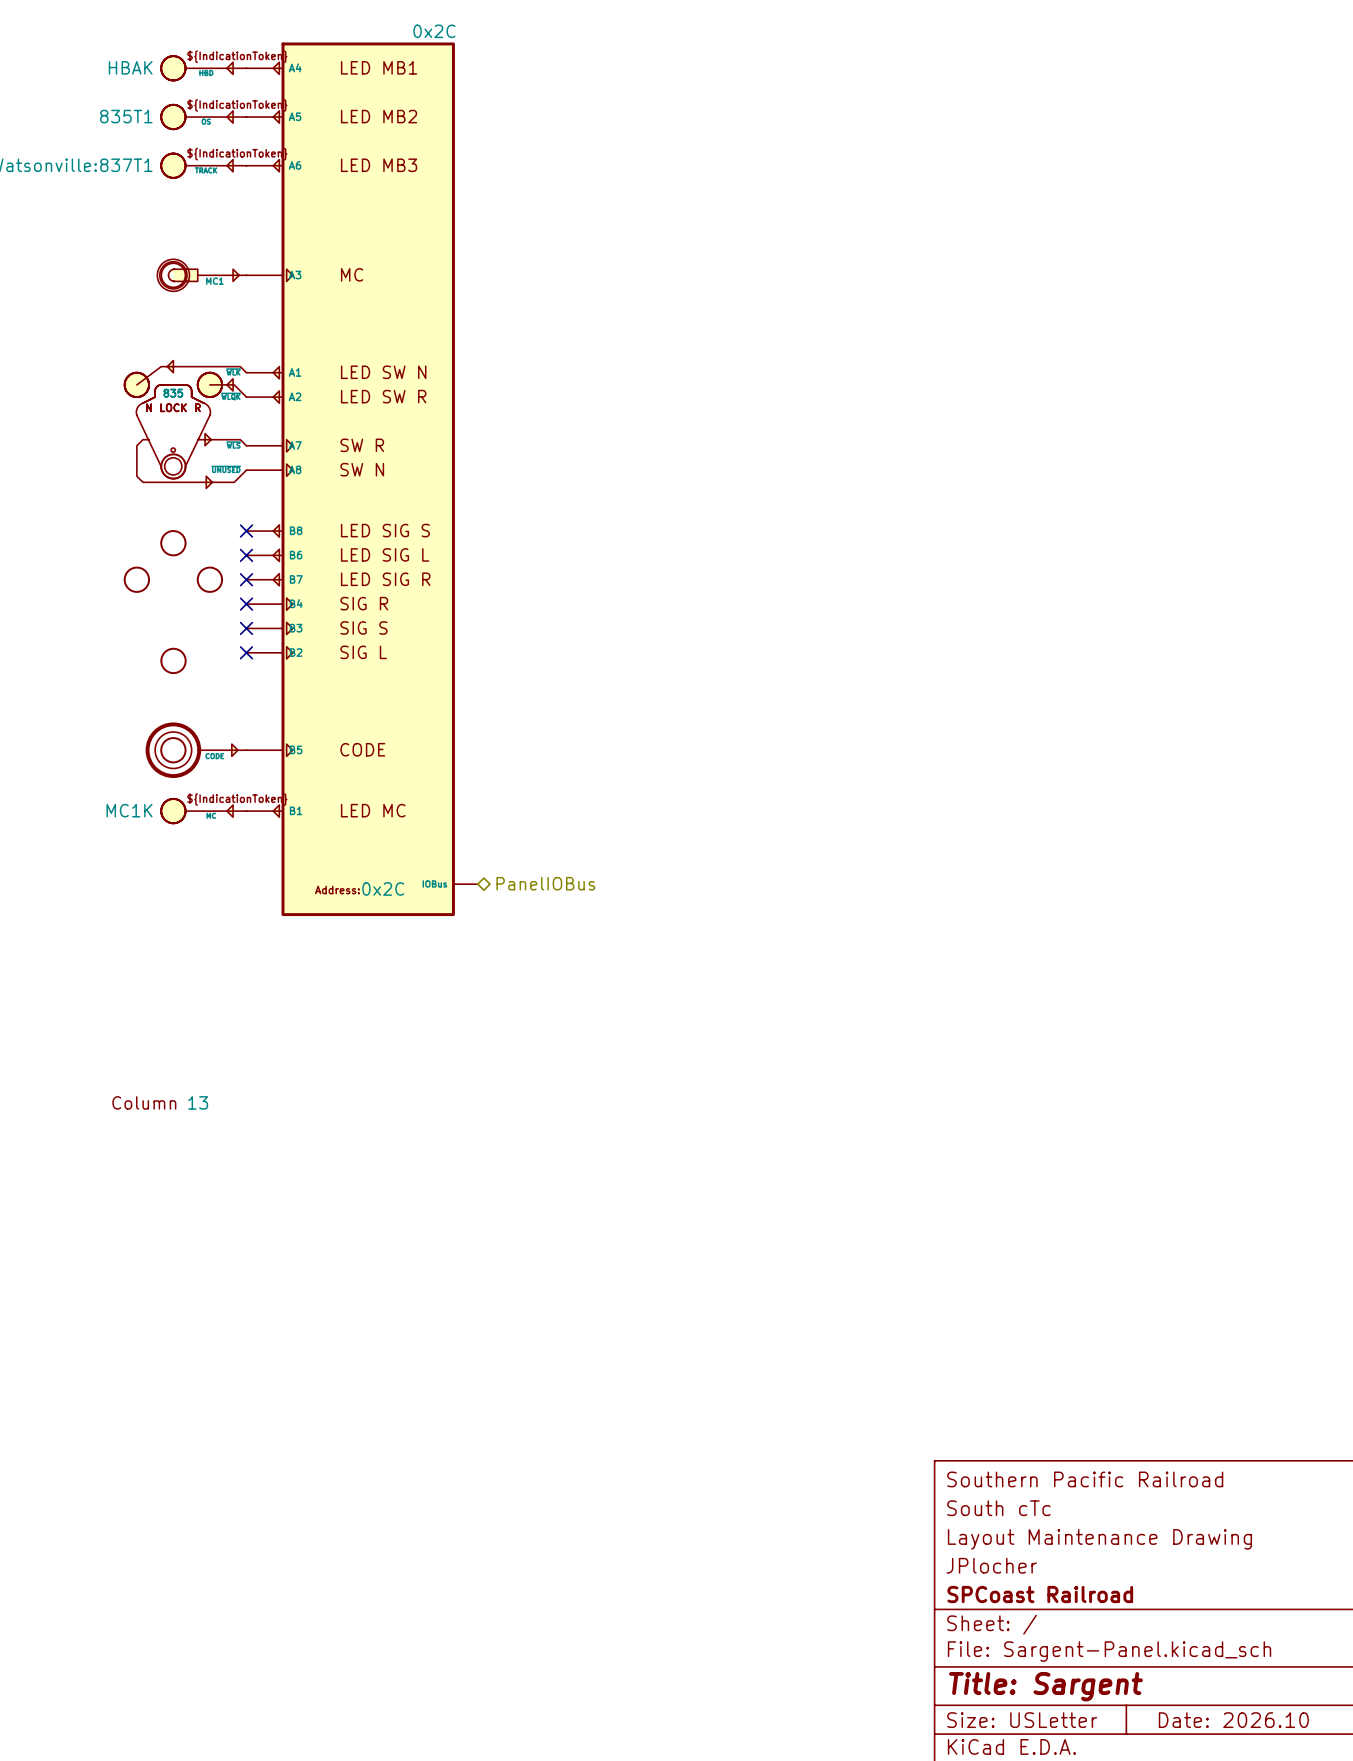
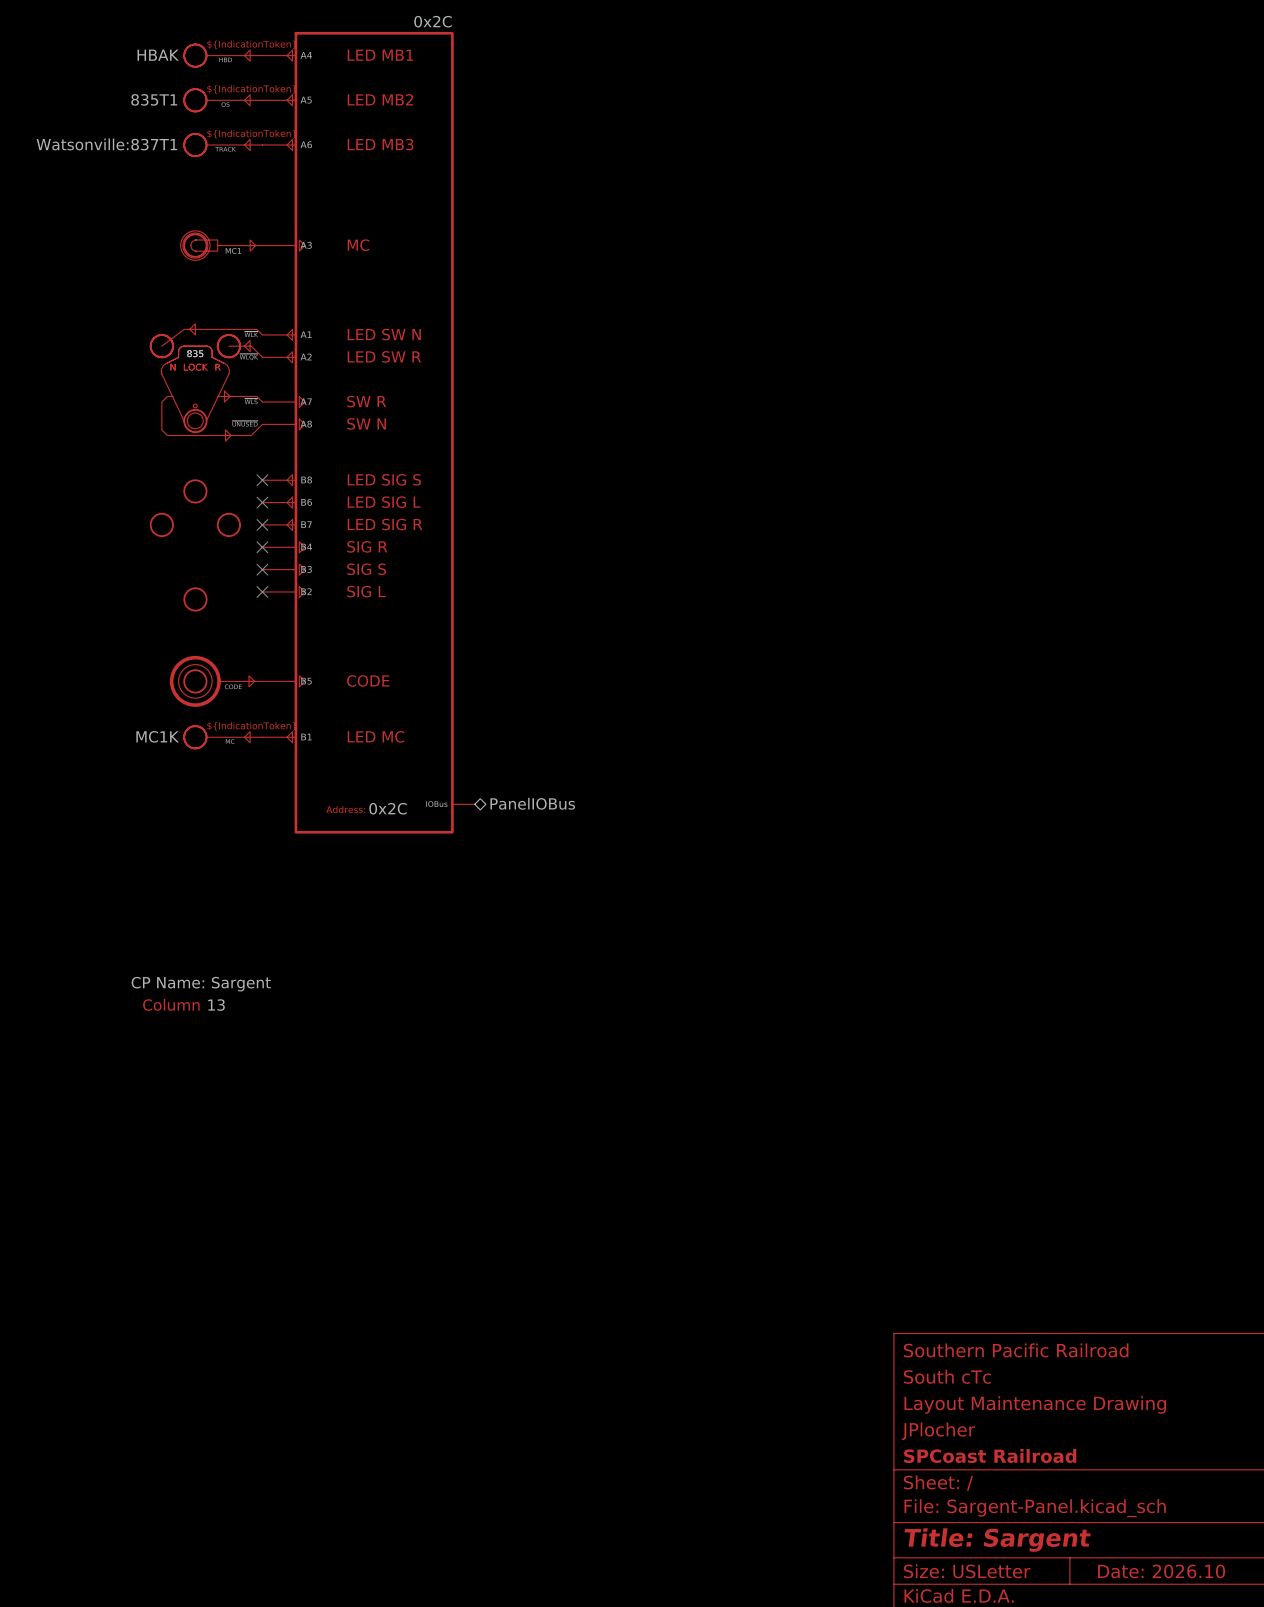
part text: none -> CP Name: Sargent (201, 984)

